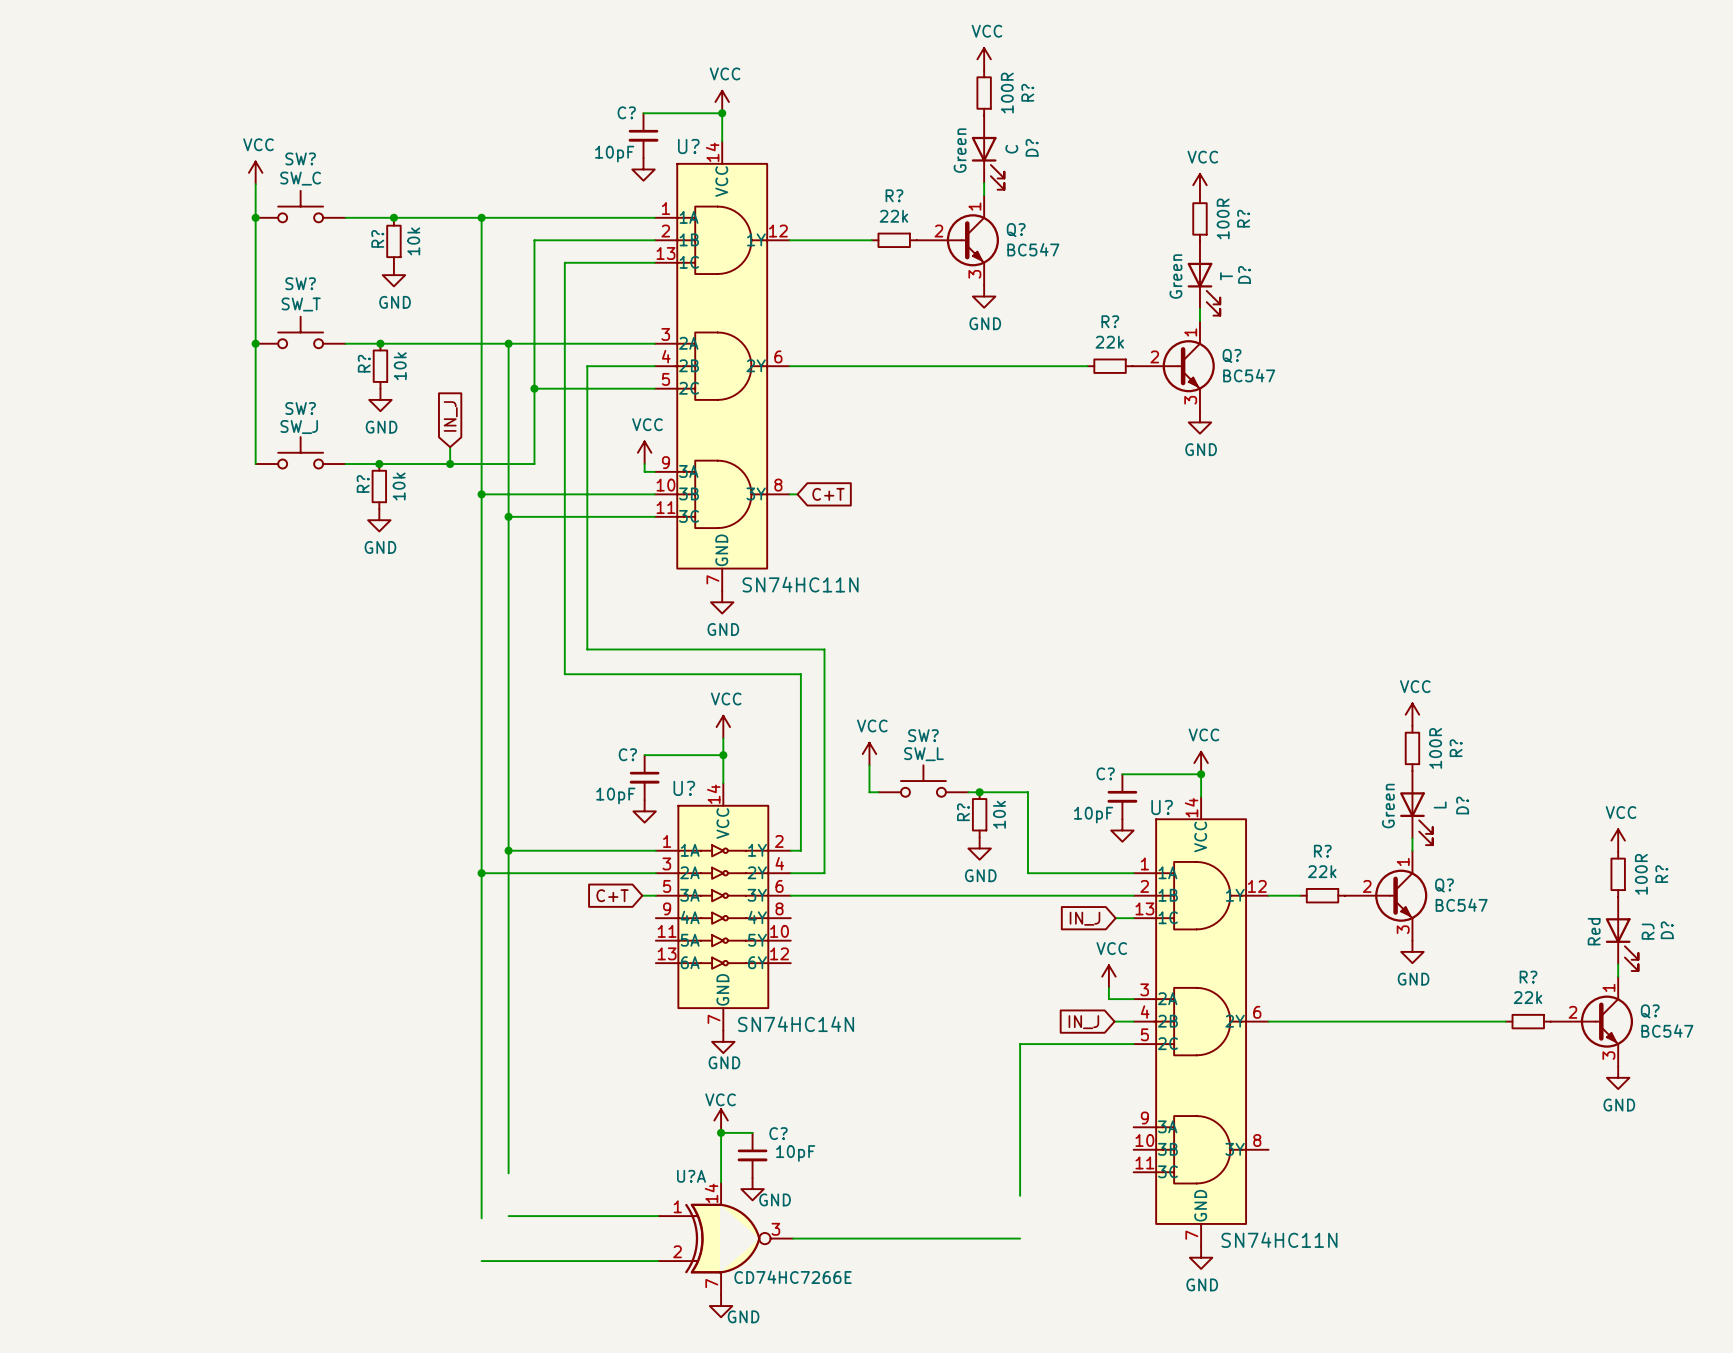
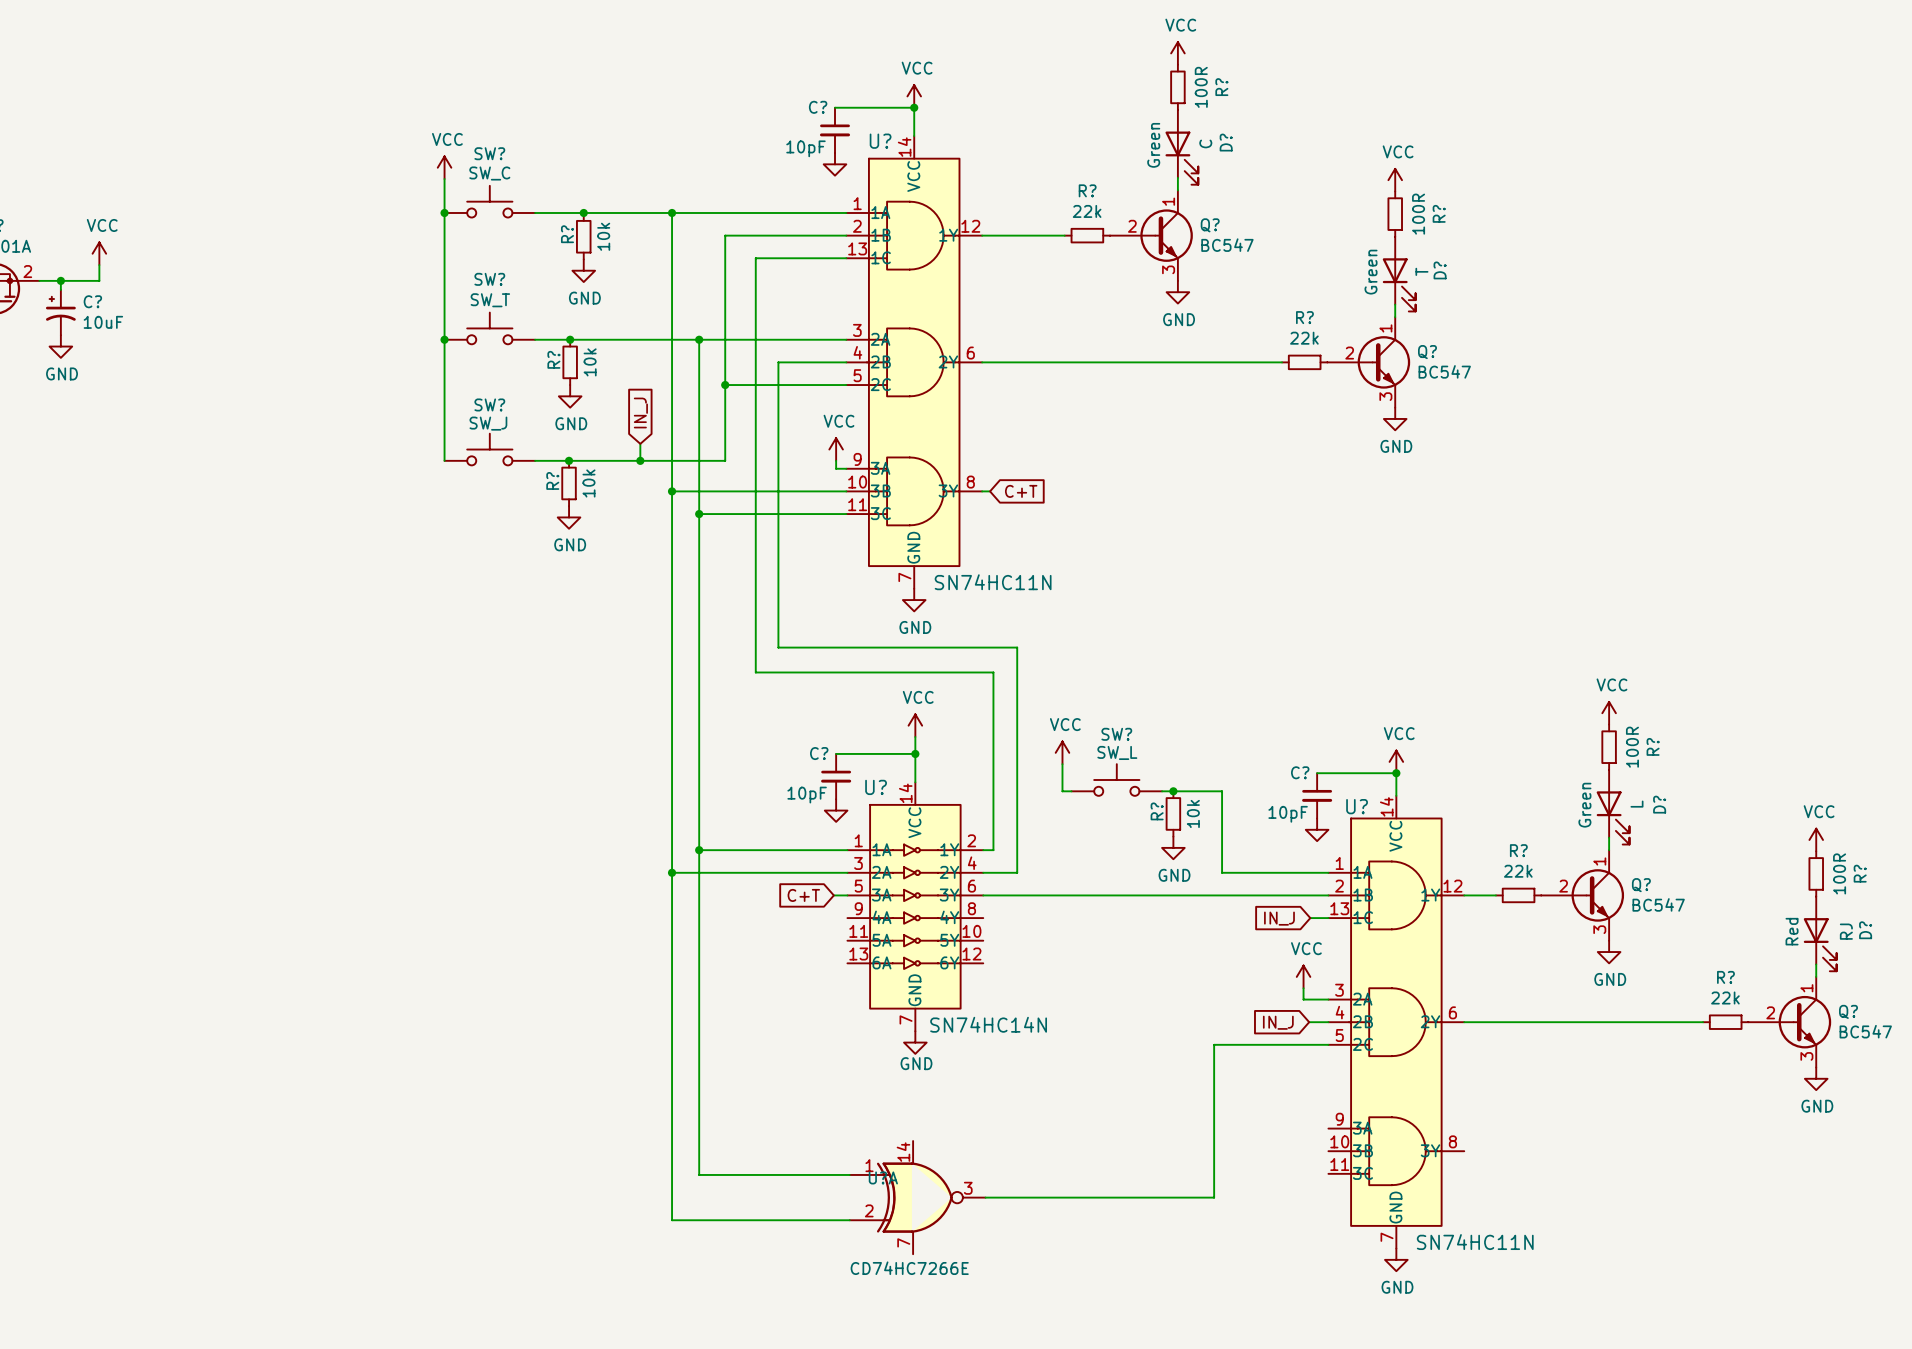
power symbol: VCC (721, 1120) -> none
wire: (721, 1131) (721, 1182) -> none
wire: (721, 1132) (752, 1132) -> none
junction: (721, 1132) -> none
C?: 10pF (752, 1155) -> none
power symbol: GND (752, 1189) -> none
wire: (508, 1216) (658, 1216) -> (699, 1174) (849, 1174)
U?A position: (725, 1238) -> (917, 1197)
wire: (793, 1238) (1020, 1238) -> (985, 1197) (1214, 1197)
wire: (481, 1261) (658, 1261) -> (672, 1220) (849, 1220)
U?A value position: CD74HC7266E (793, 1277) -> CD74HC7266E (909, 1268)
power symbol: GND (721, 1306) -> none

